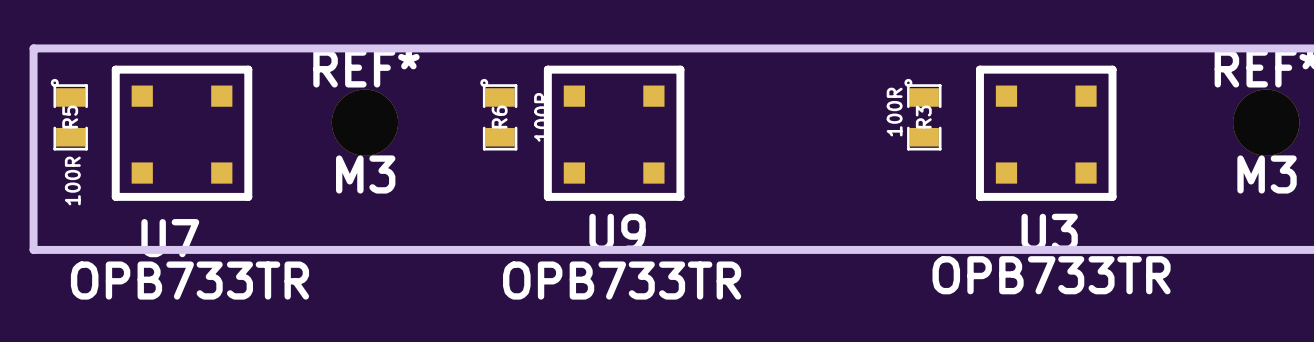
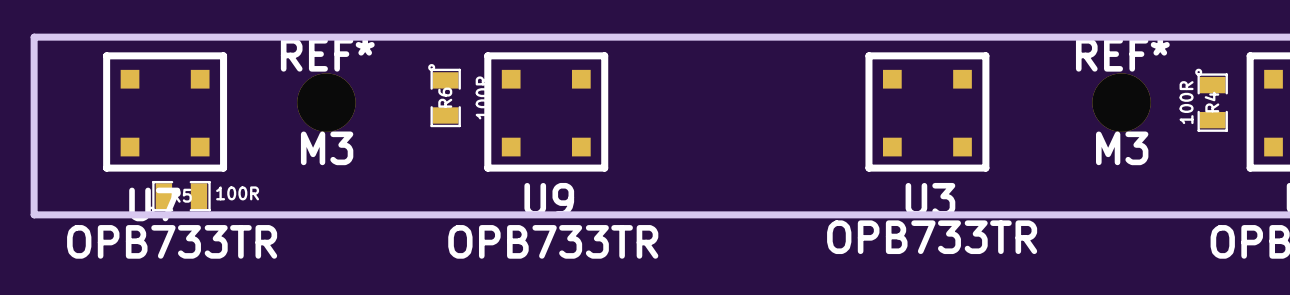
R5 rotation: 0° (69, 114) -> 90° counterclockwise (179, 197)
R5 position: (69, 114) -> (179, 197)
R3: 100R (922, 114) -> none

